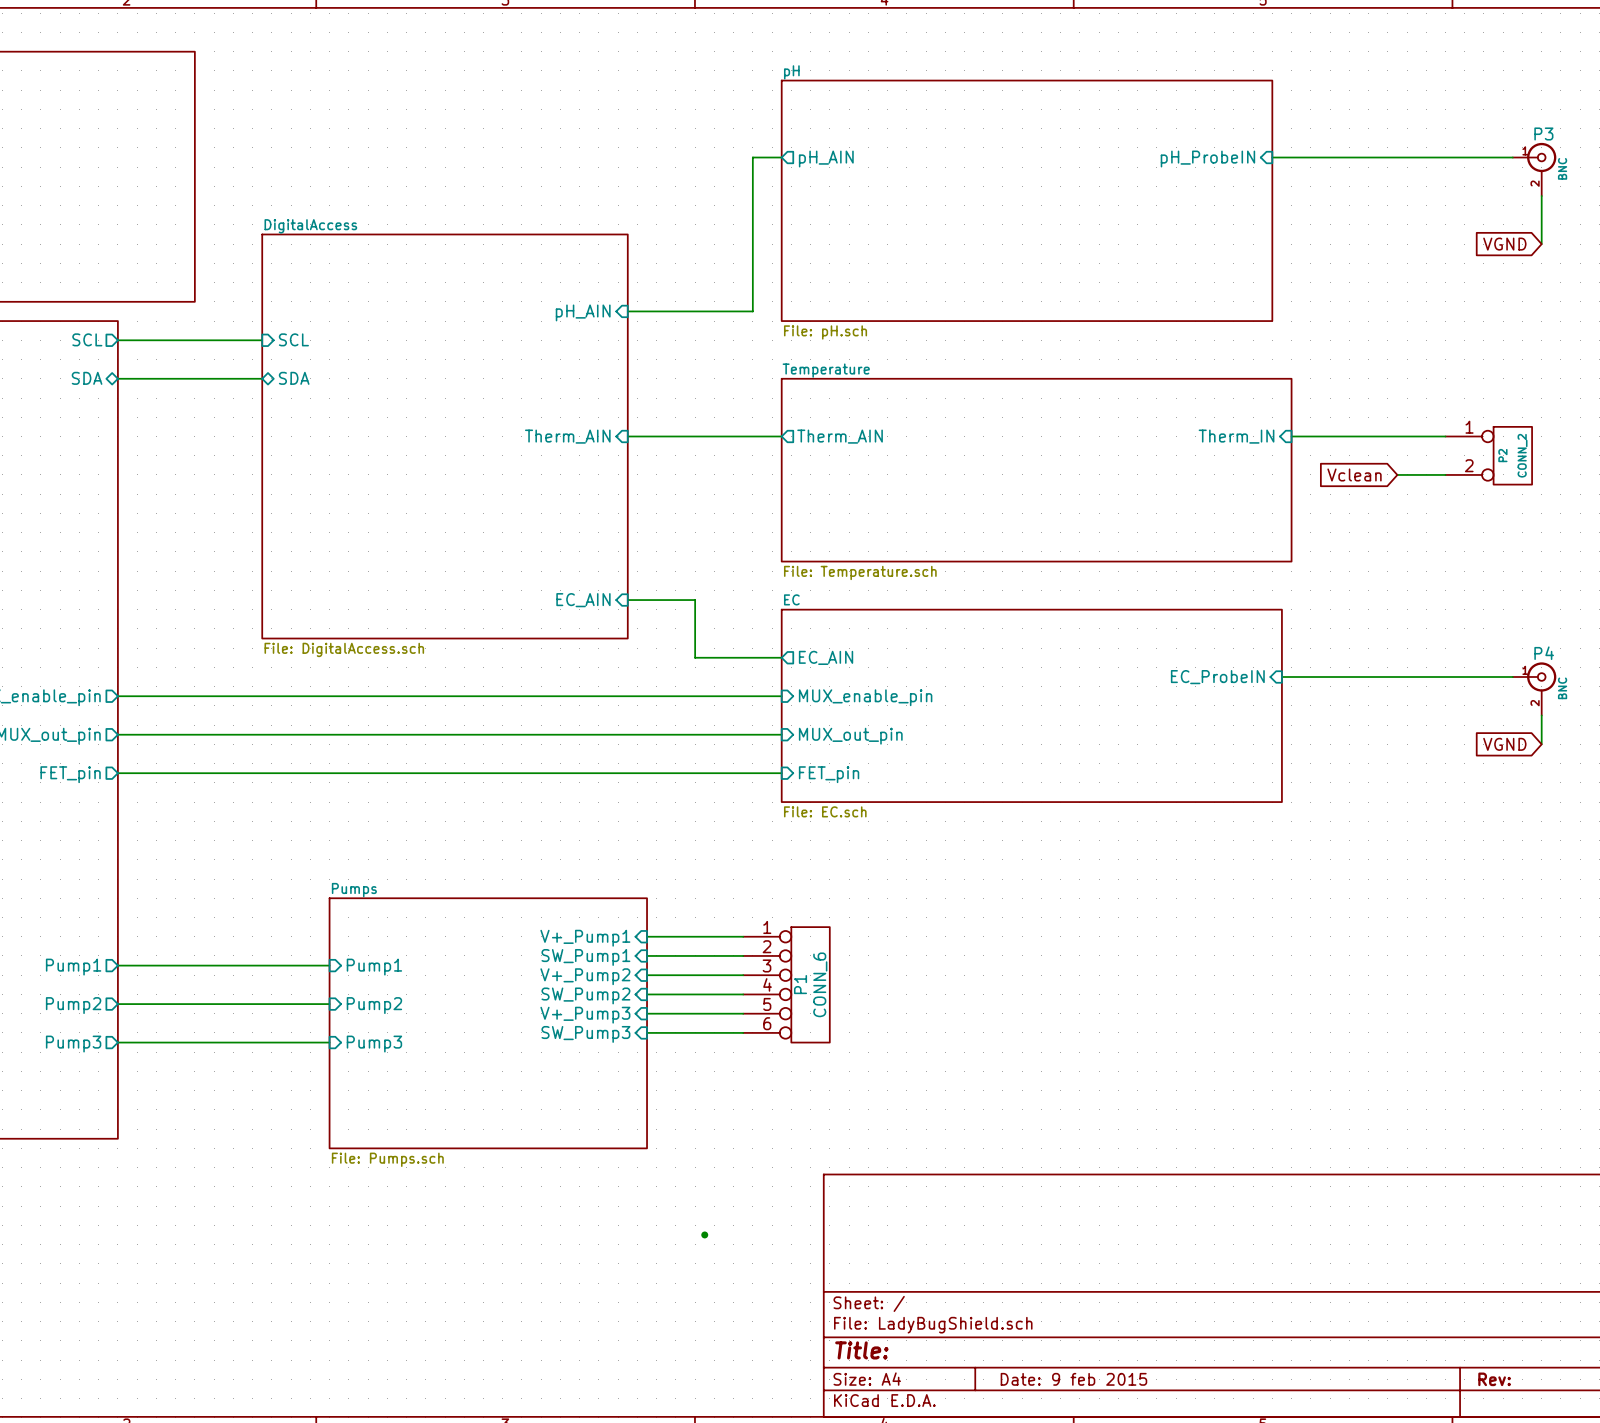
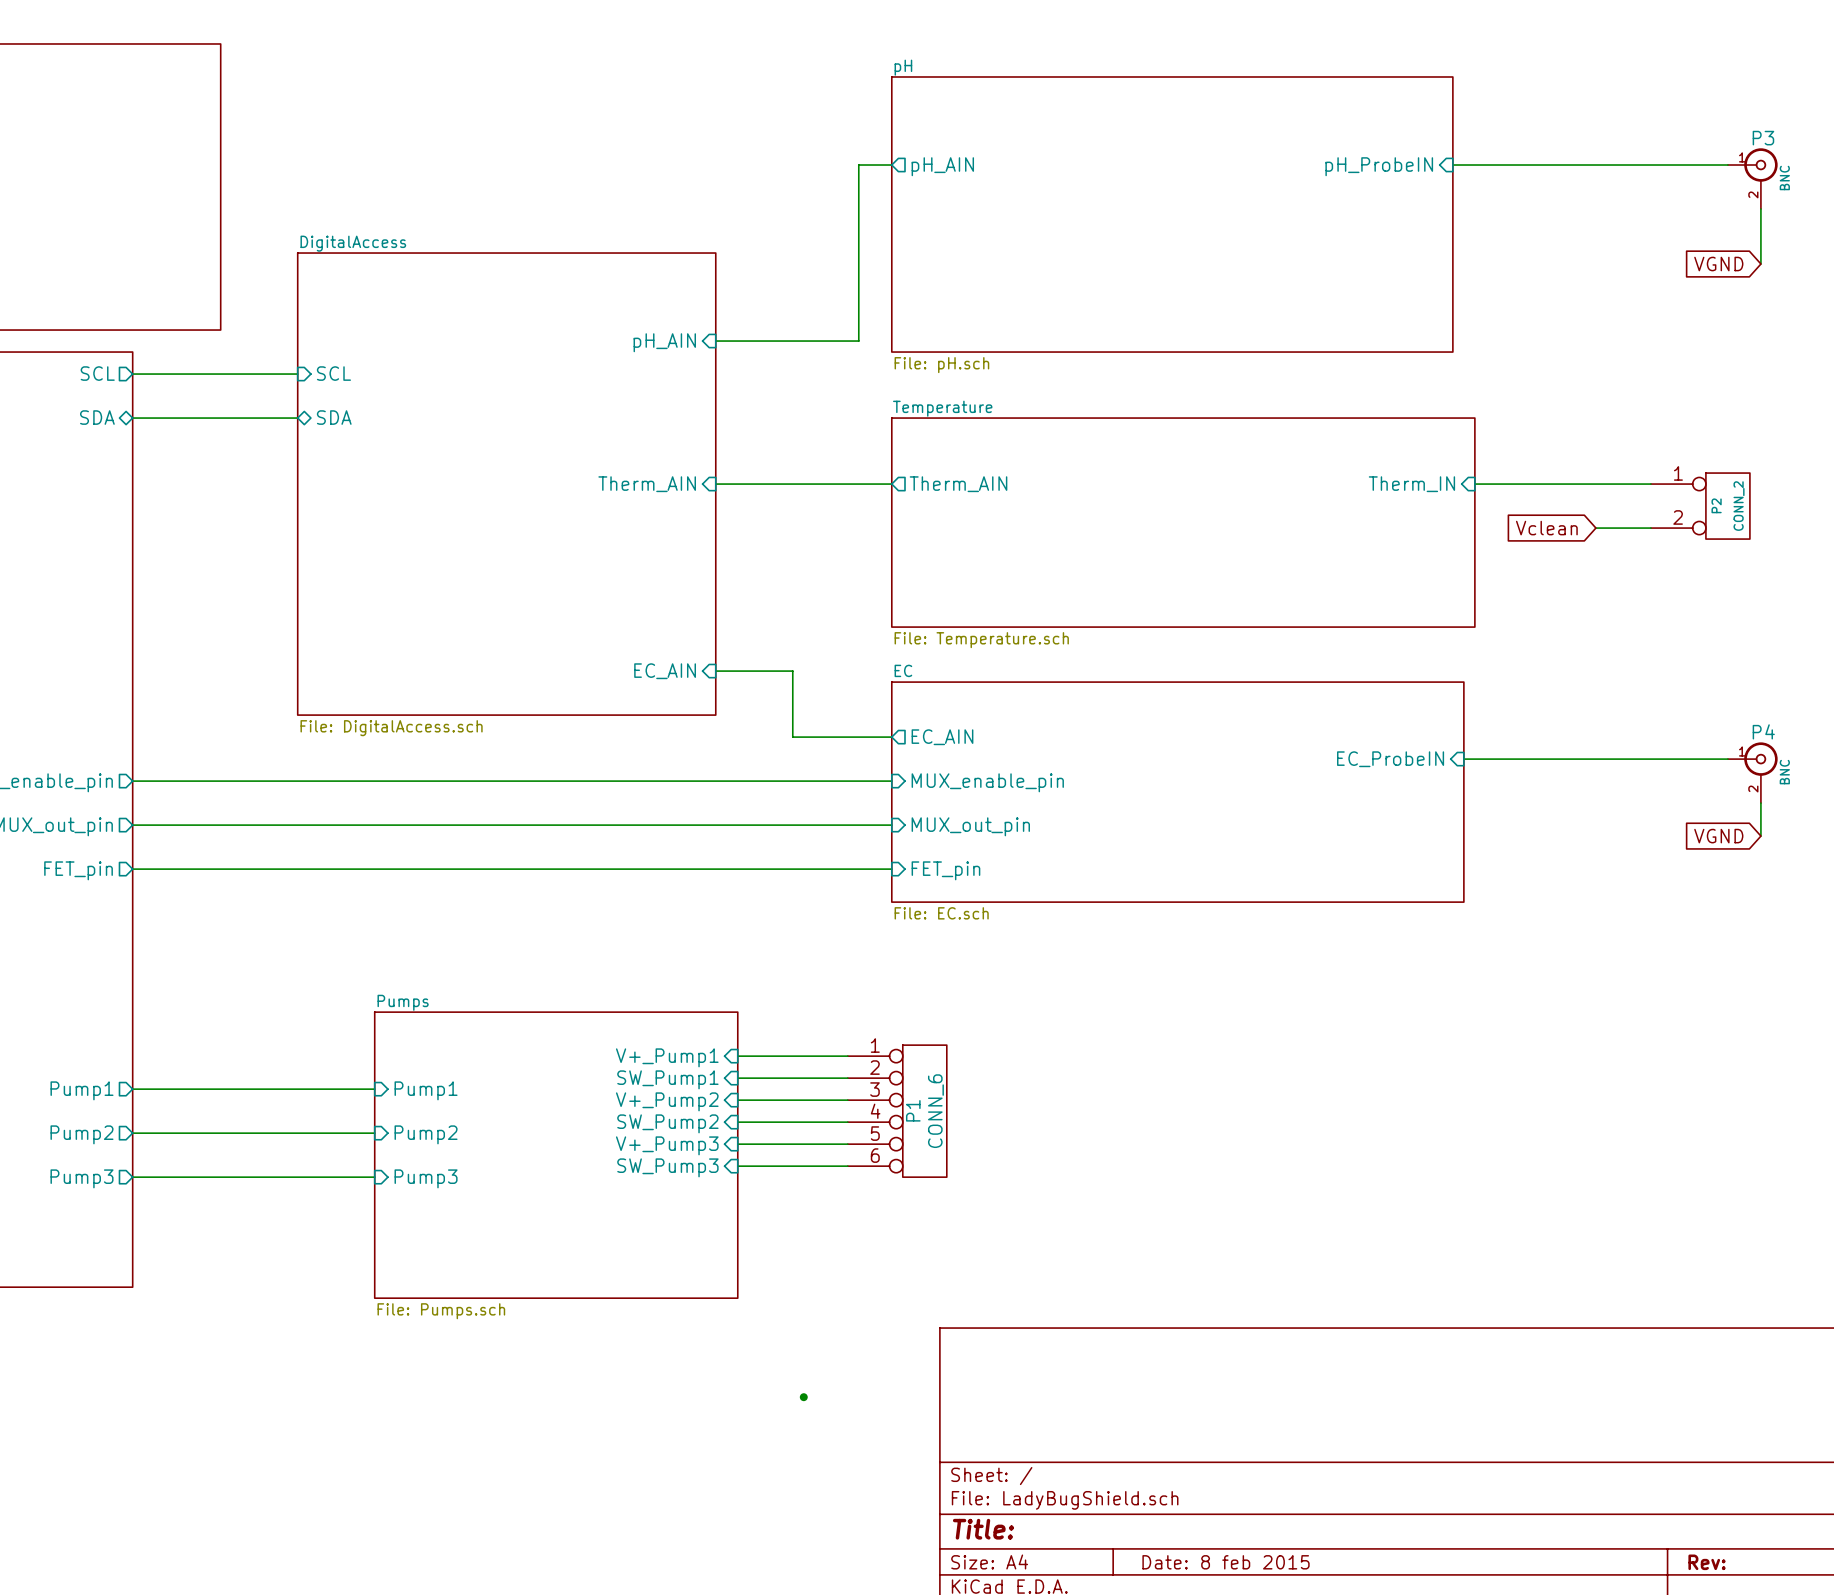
title block: Date: 9 feb 2015 (1073, 1379) -> Date: 8 feb 2015 (1226, 1562)

